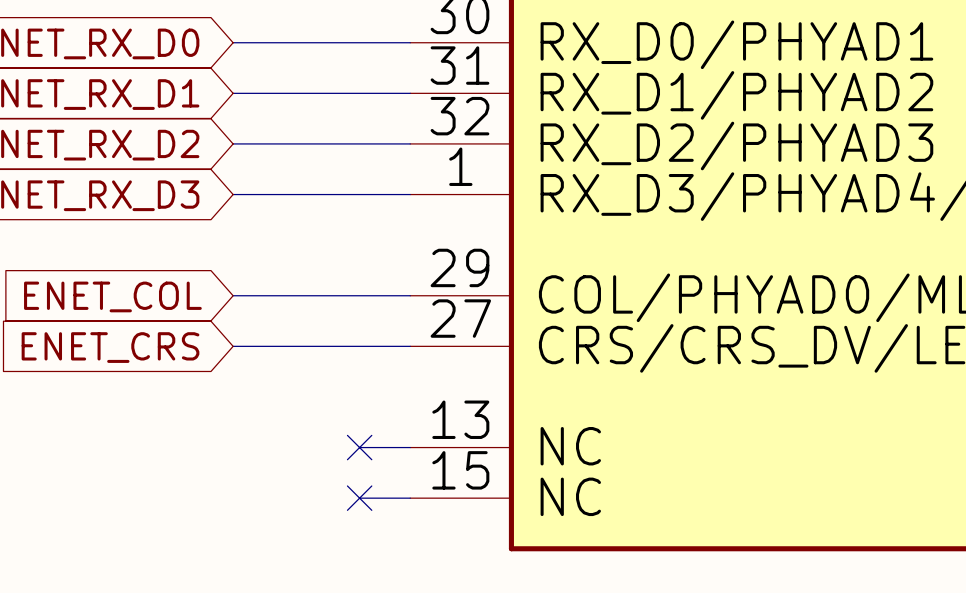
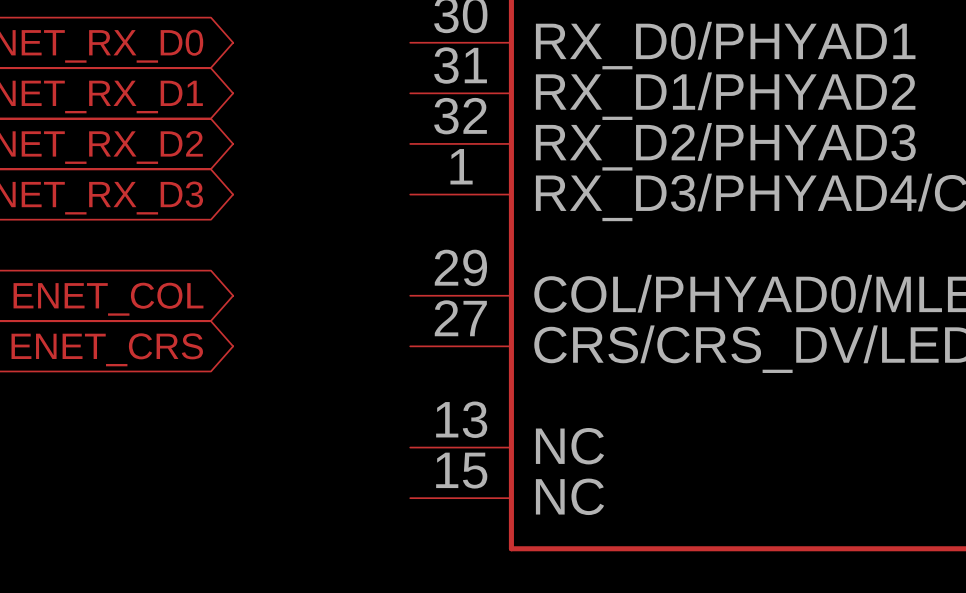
wire: (233, 42) (410, 42) -> none
wire: (233, 93) (410, 93) -> none
wire: (233, 143) (410, 143) -> none
wire: (233, 194) (410, 194) -> none
wire: (233, 295) (410, 295) -> none
wire: (233, 346) (410, 346) -> none
wire: (359, 447) (410, 447) -> none
no-connect mark: (359, 447) -> none
wire: (359, 498) (410, 498) -> none
no-connect mark: (359, 498) -> none

